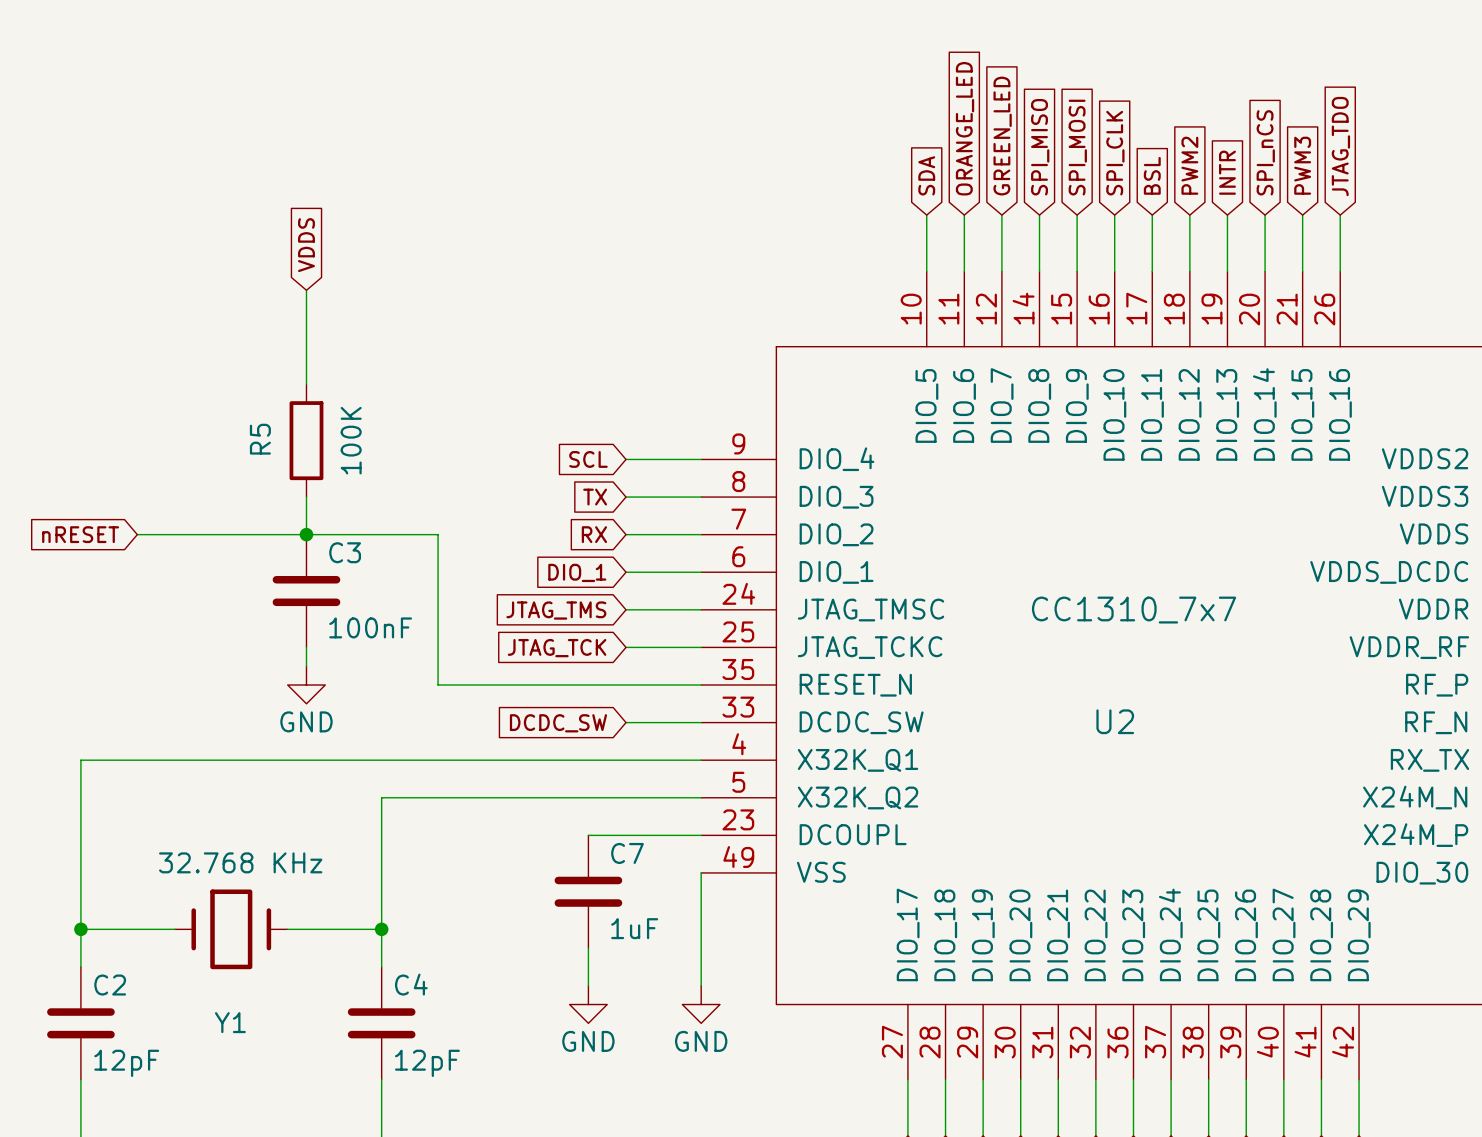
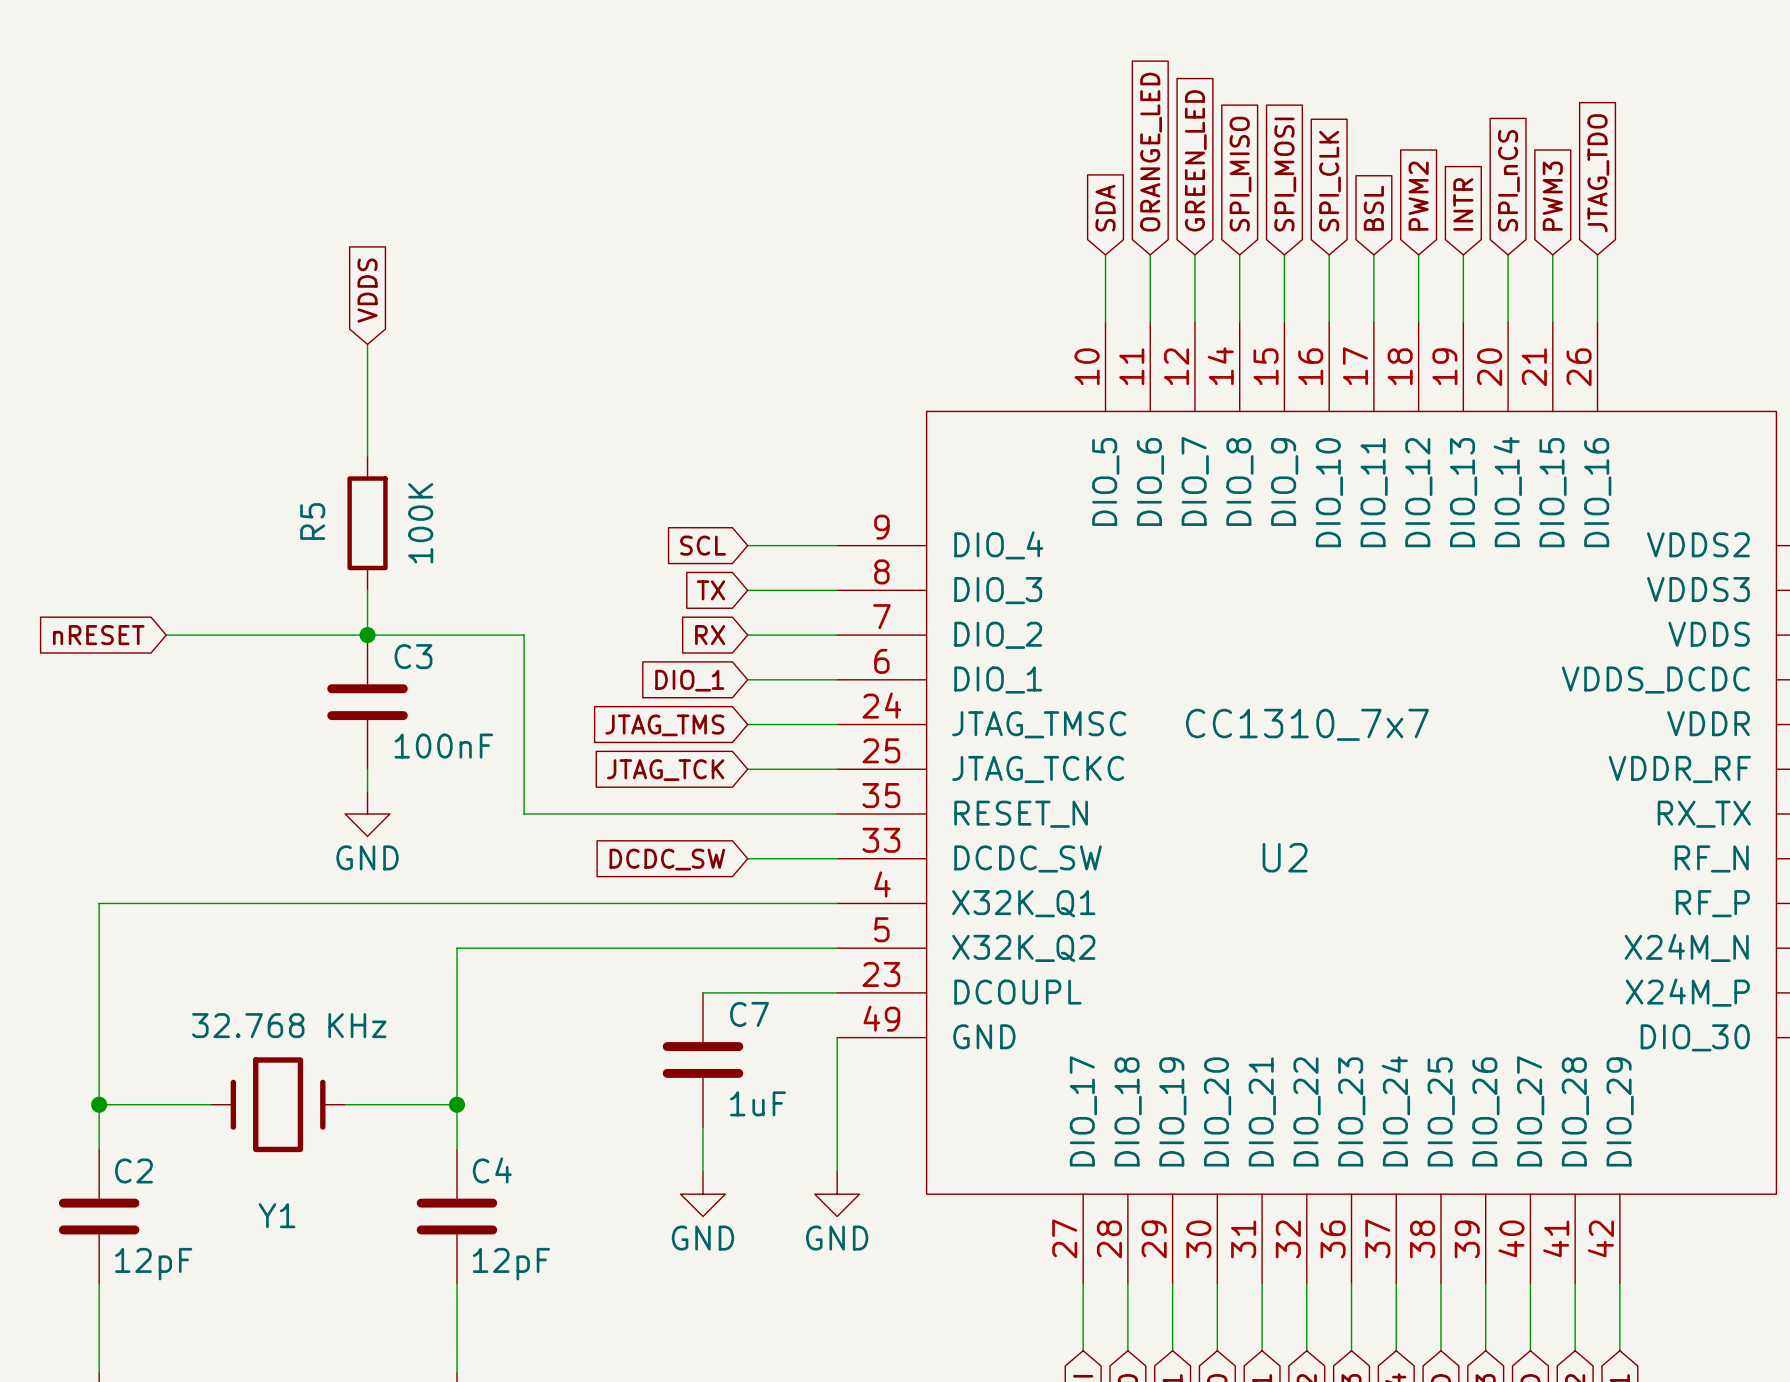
U2 value position: CC1310_7x7 (1134, 610) -> CC1310_7x7 (1307, 724)
U2 pin name: RF_P (1437, 685) -> RX_TX (1704, 814)
U2 name position: U2 (1115, 721) -> U2 (1285, 857)
U2 pin name: RX_TX (1429, 760) -> RF_P (1712, 903)
U2 pin name: VSS (821, 872) -> GND (984, 1036)

